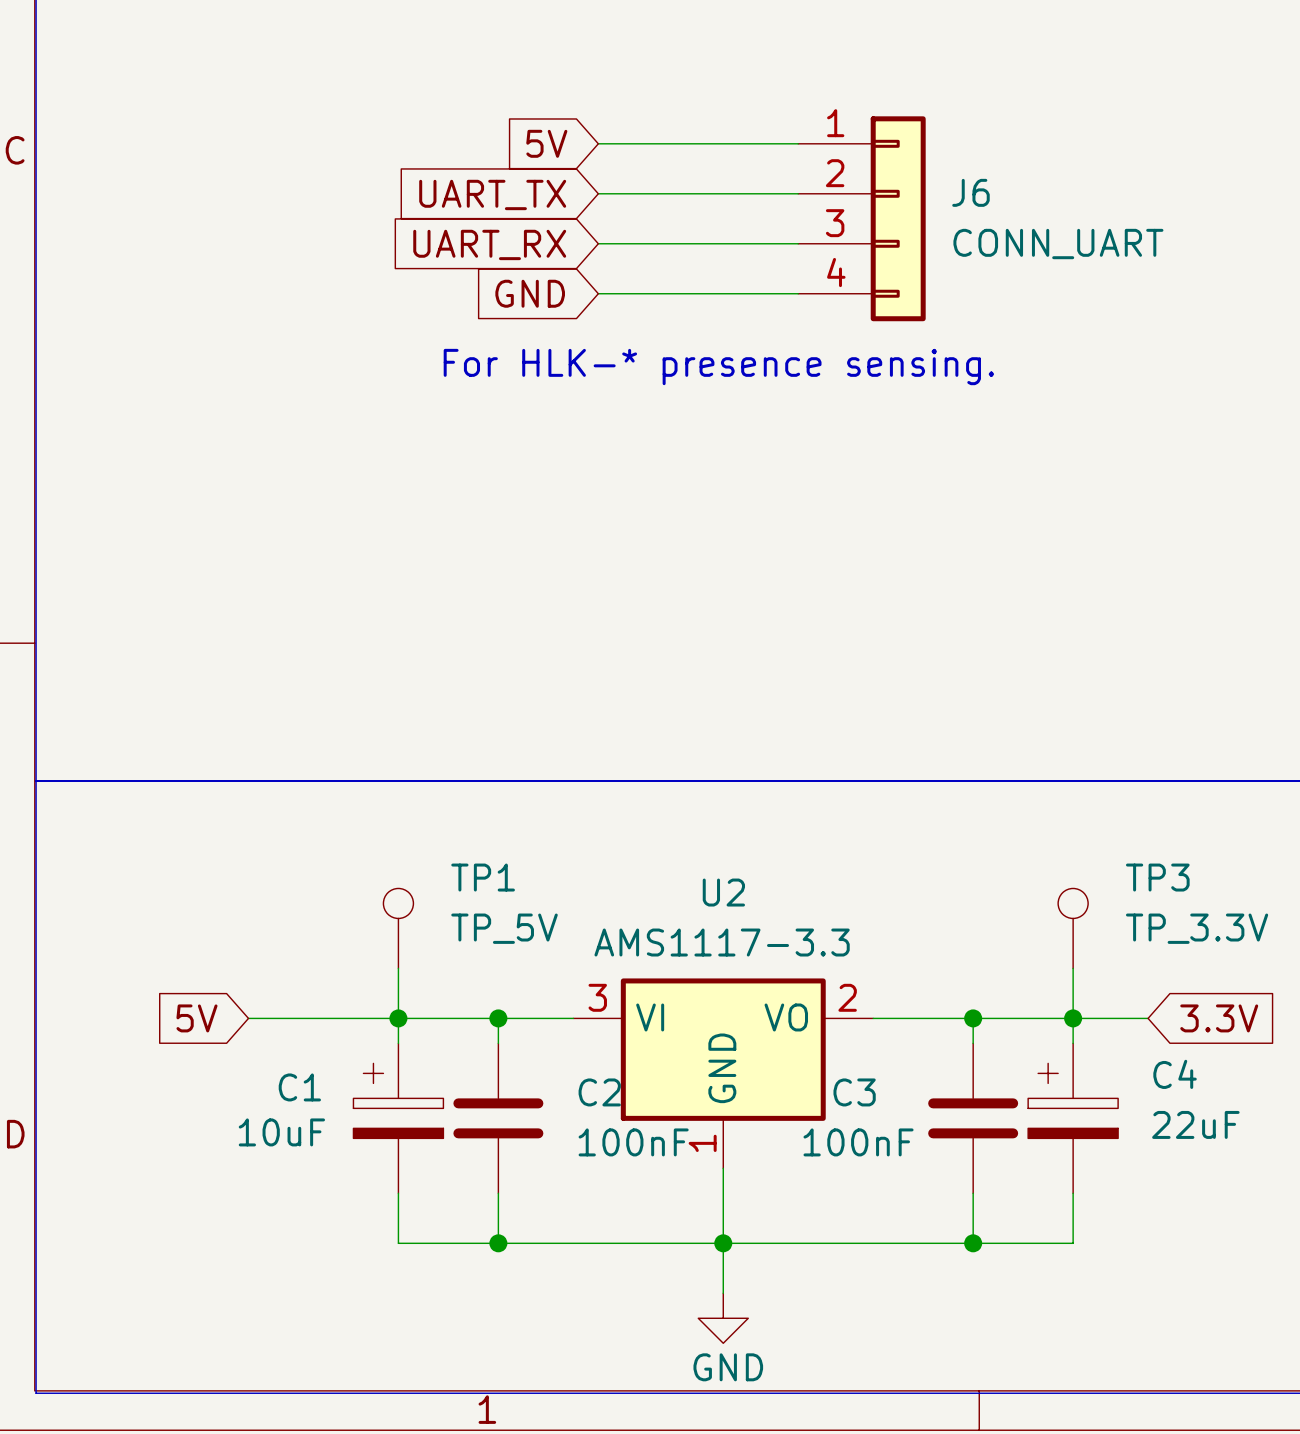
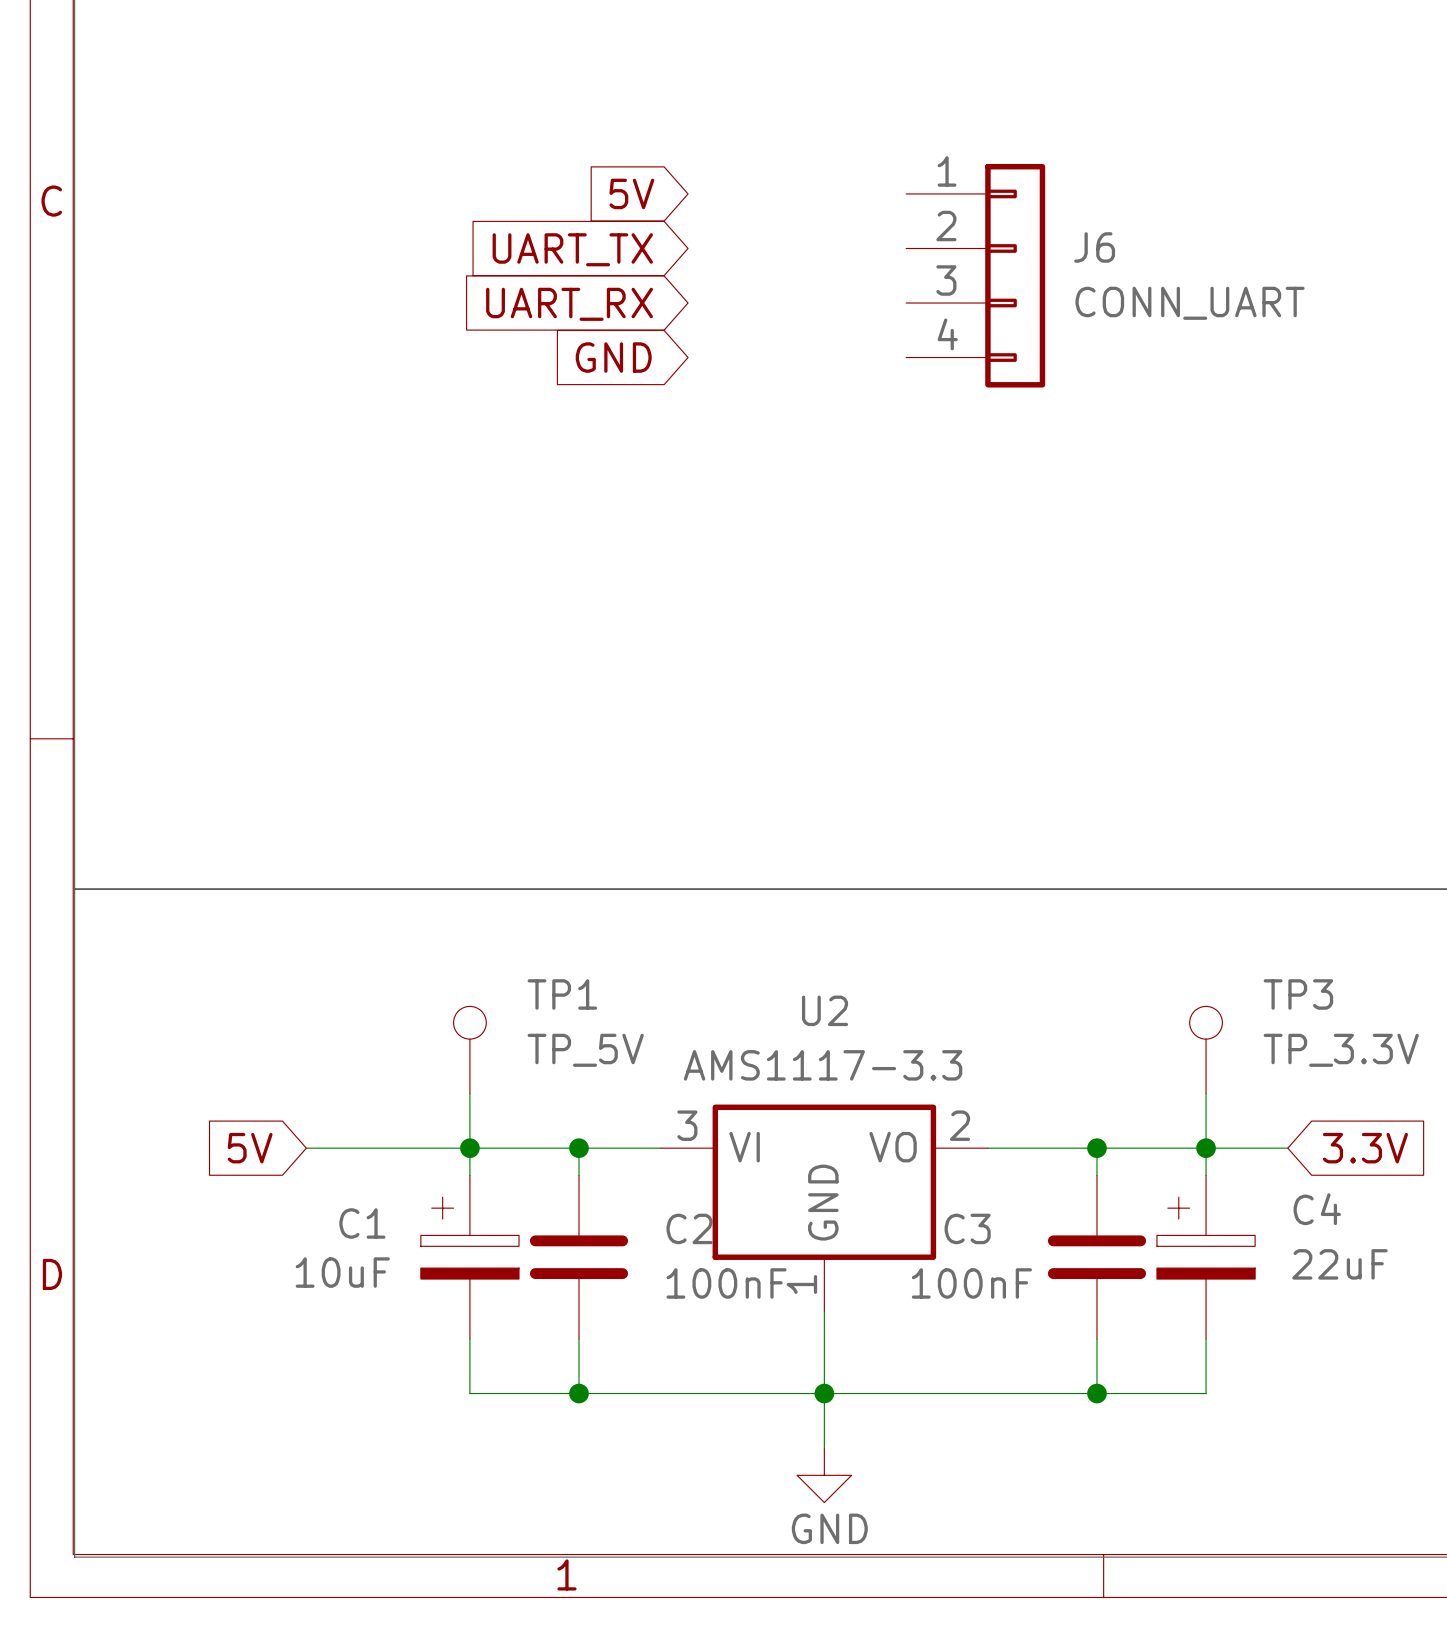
wire: (598, 143) (798, 143) -> none
wire: (598, 193) (798, 193) -> none
wire: (598, 243) (798, 243) -> none
wire: (598, 293) (798, 293) -> none
text: For HLK-* presence sensing. (718, 367) -> none

